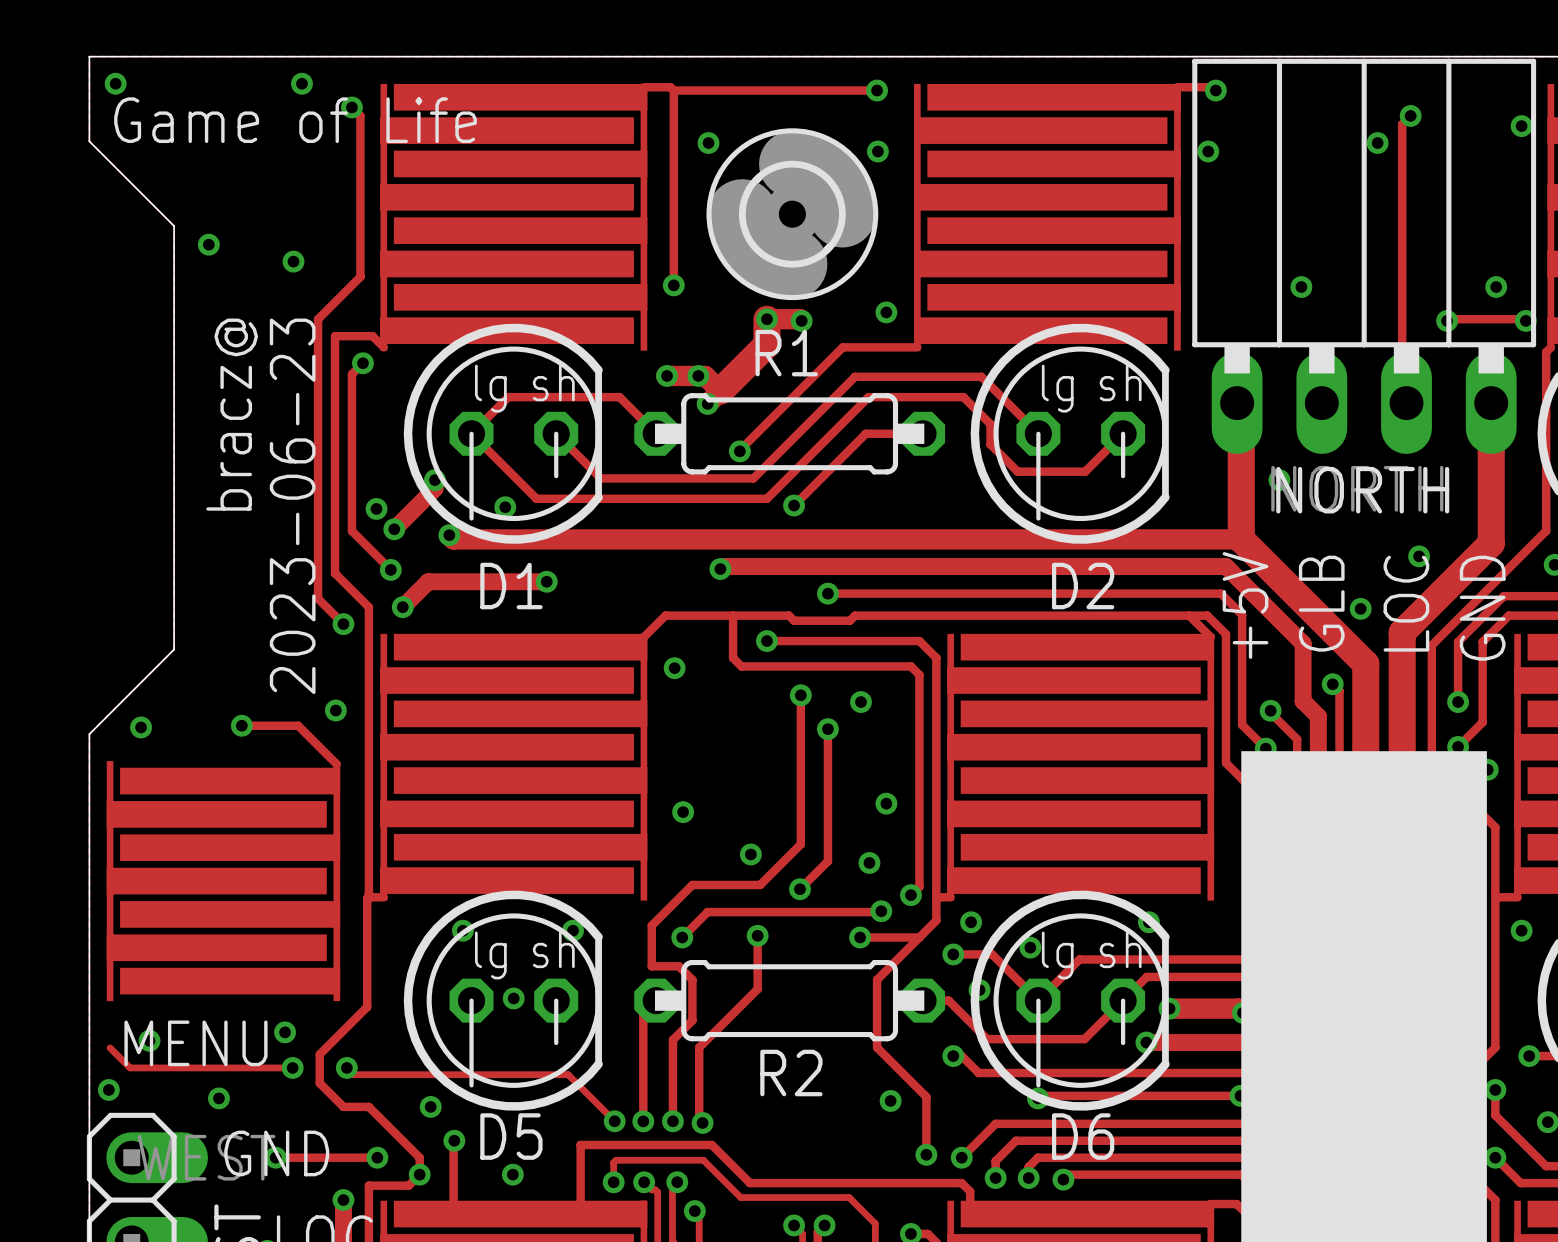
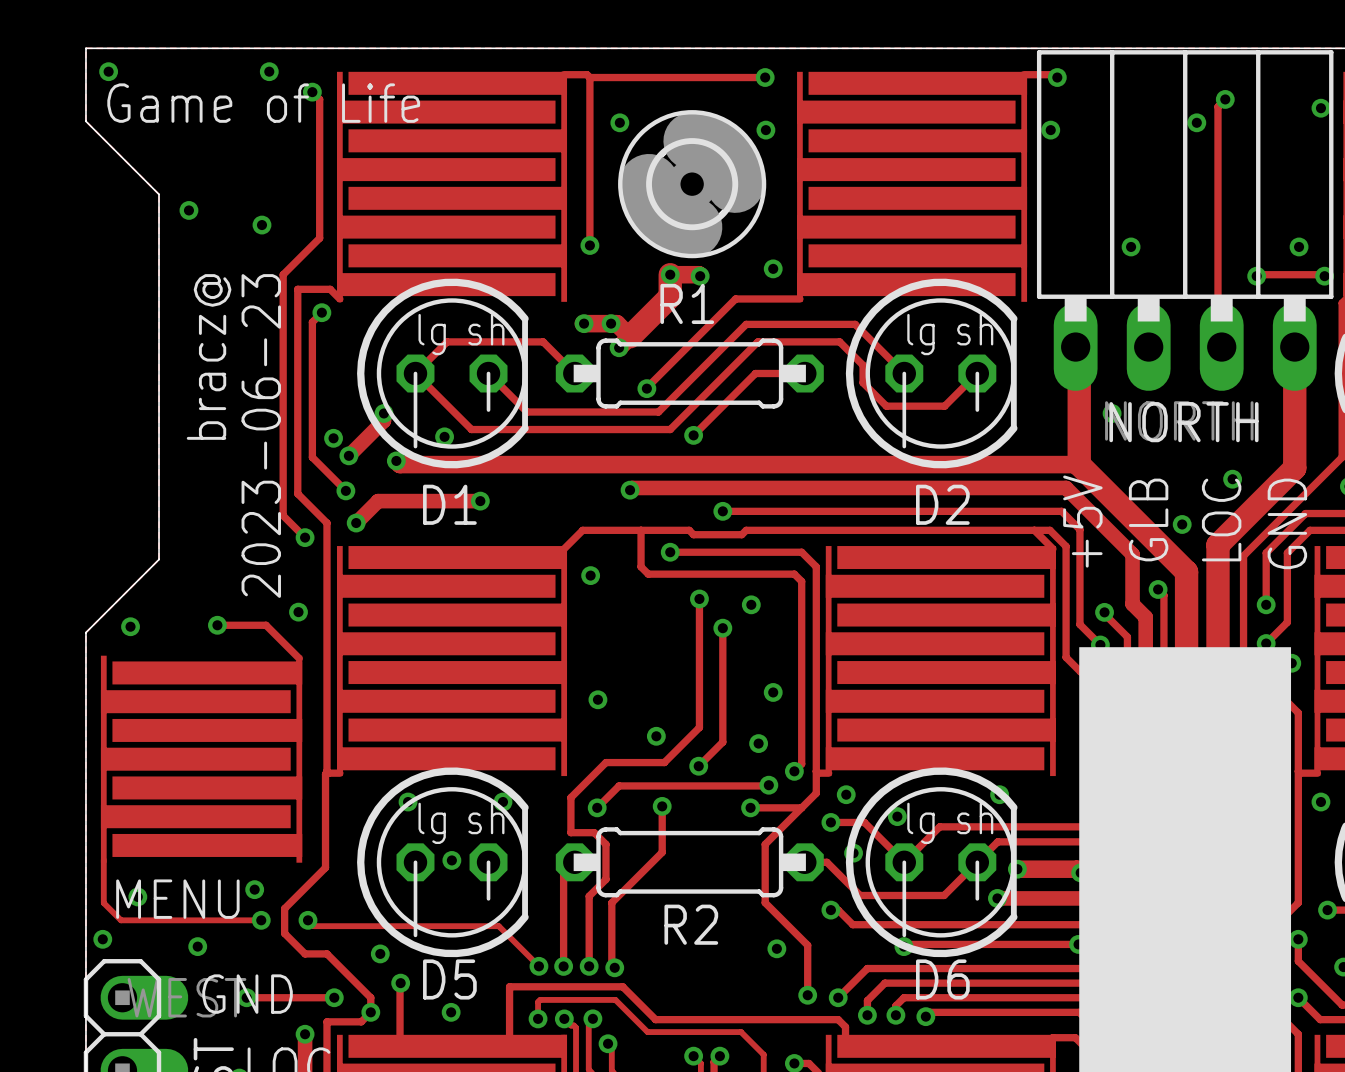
track: none -> (103, 859) (103, 903)

